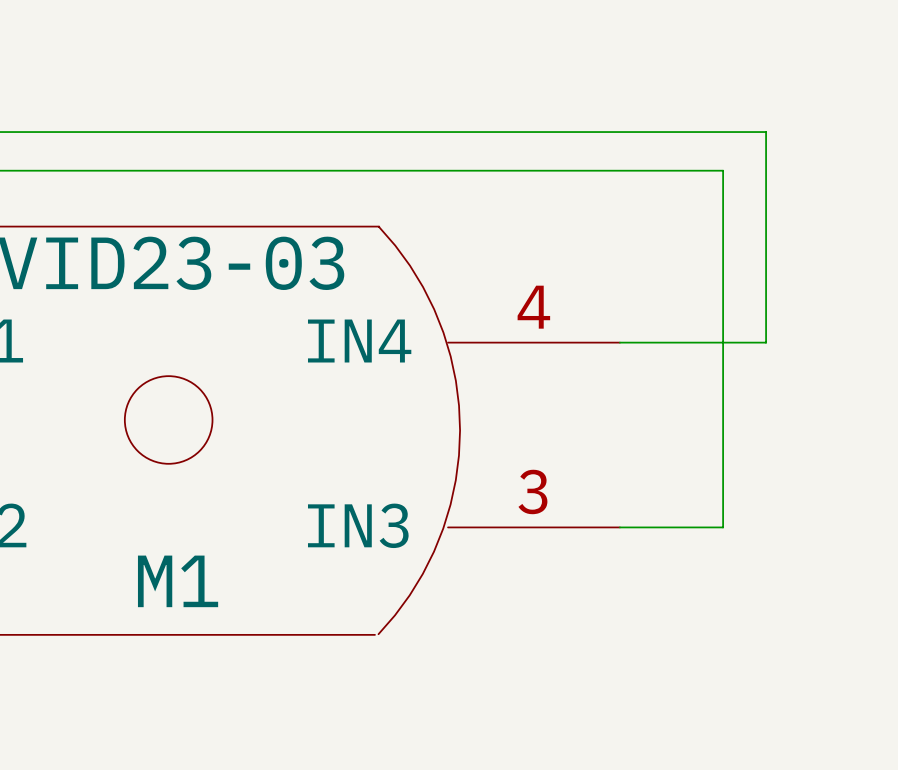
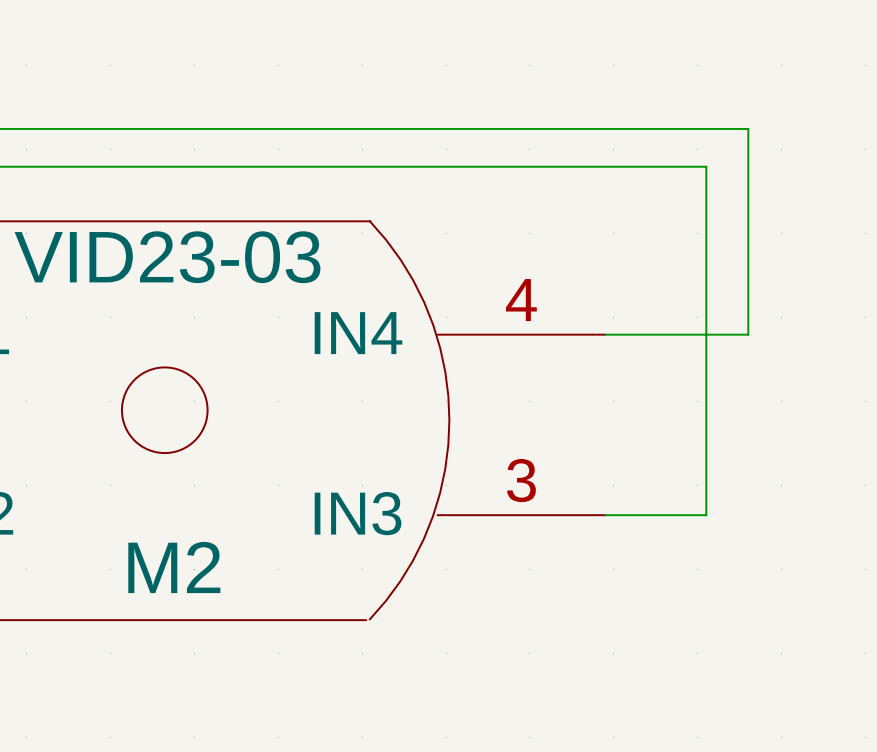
M1 name: M1 (178, 581) -> M2 (174, 567)

